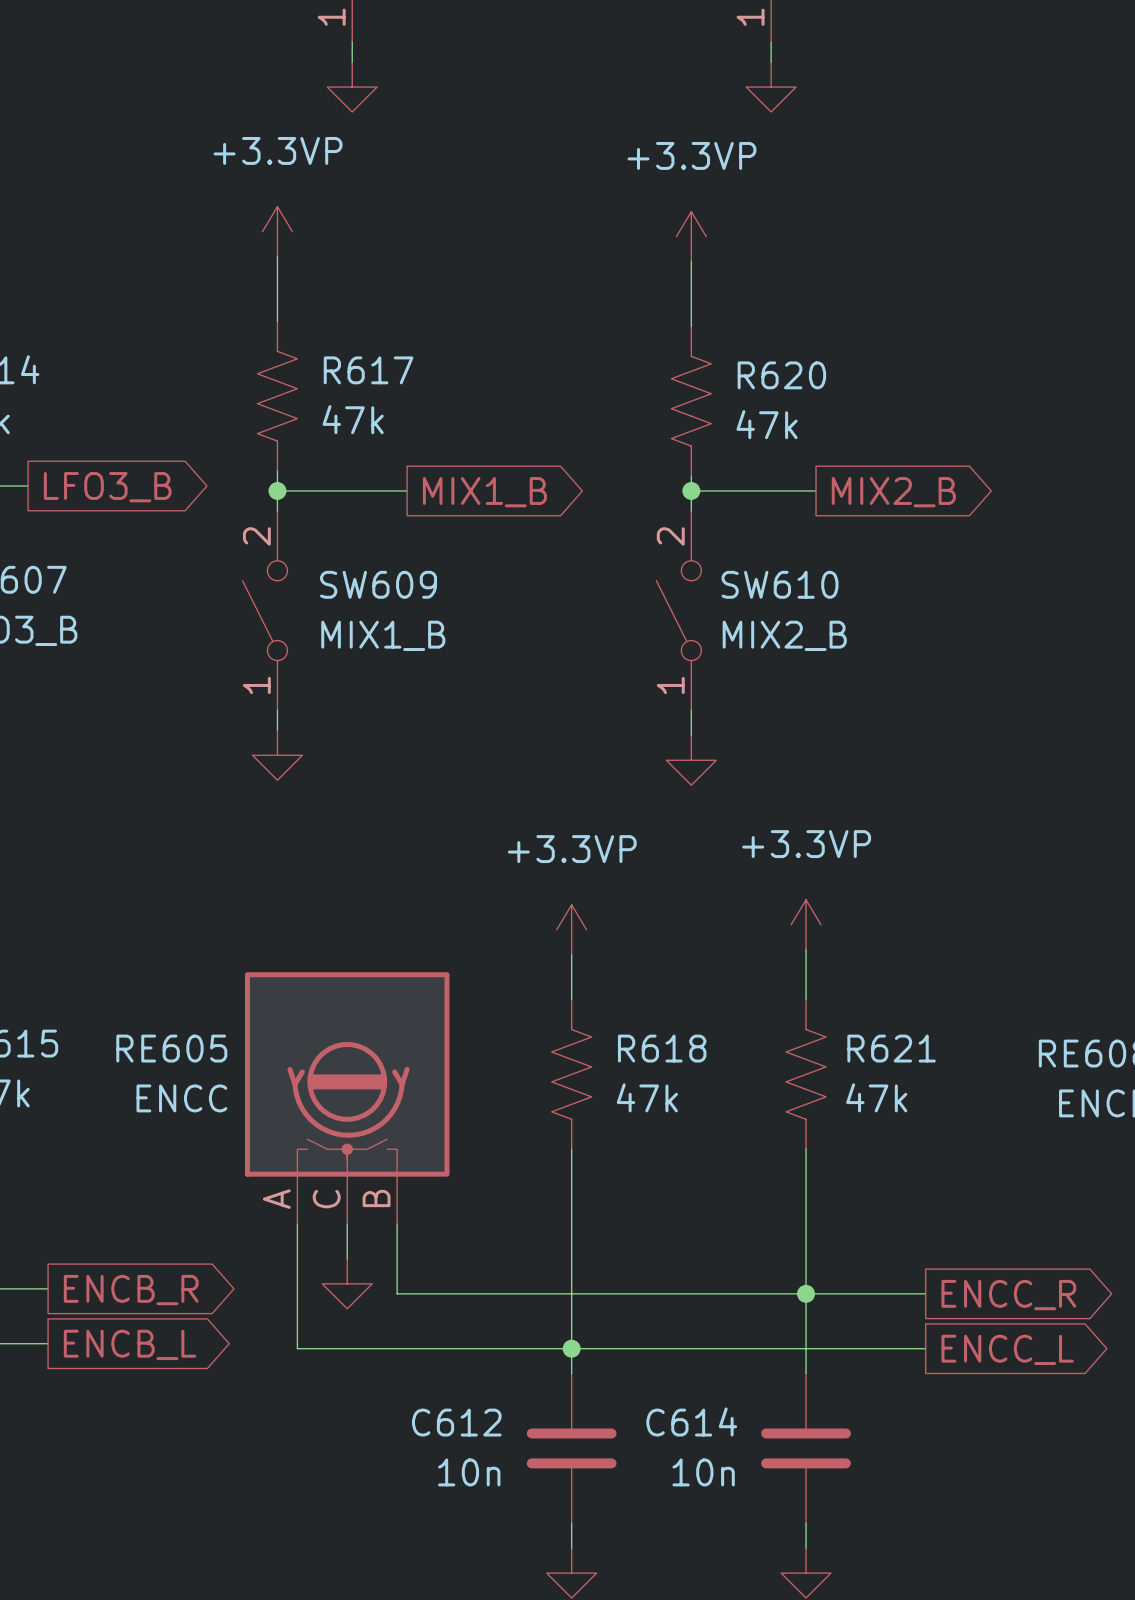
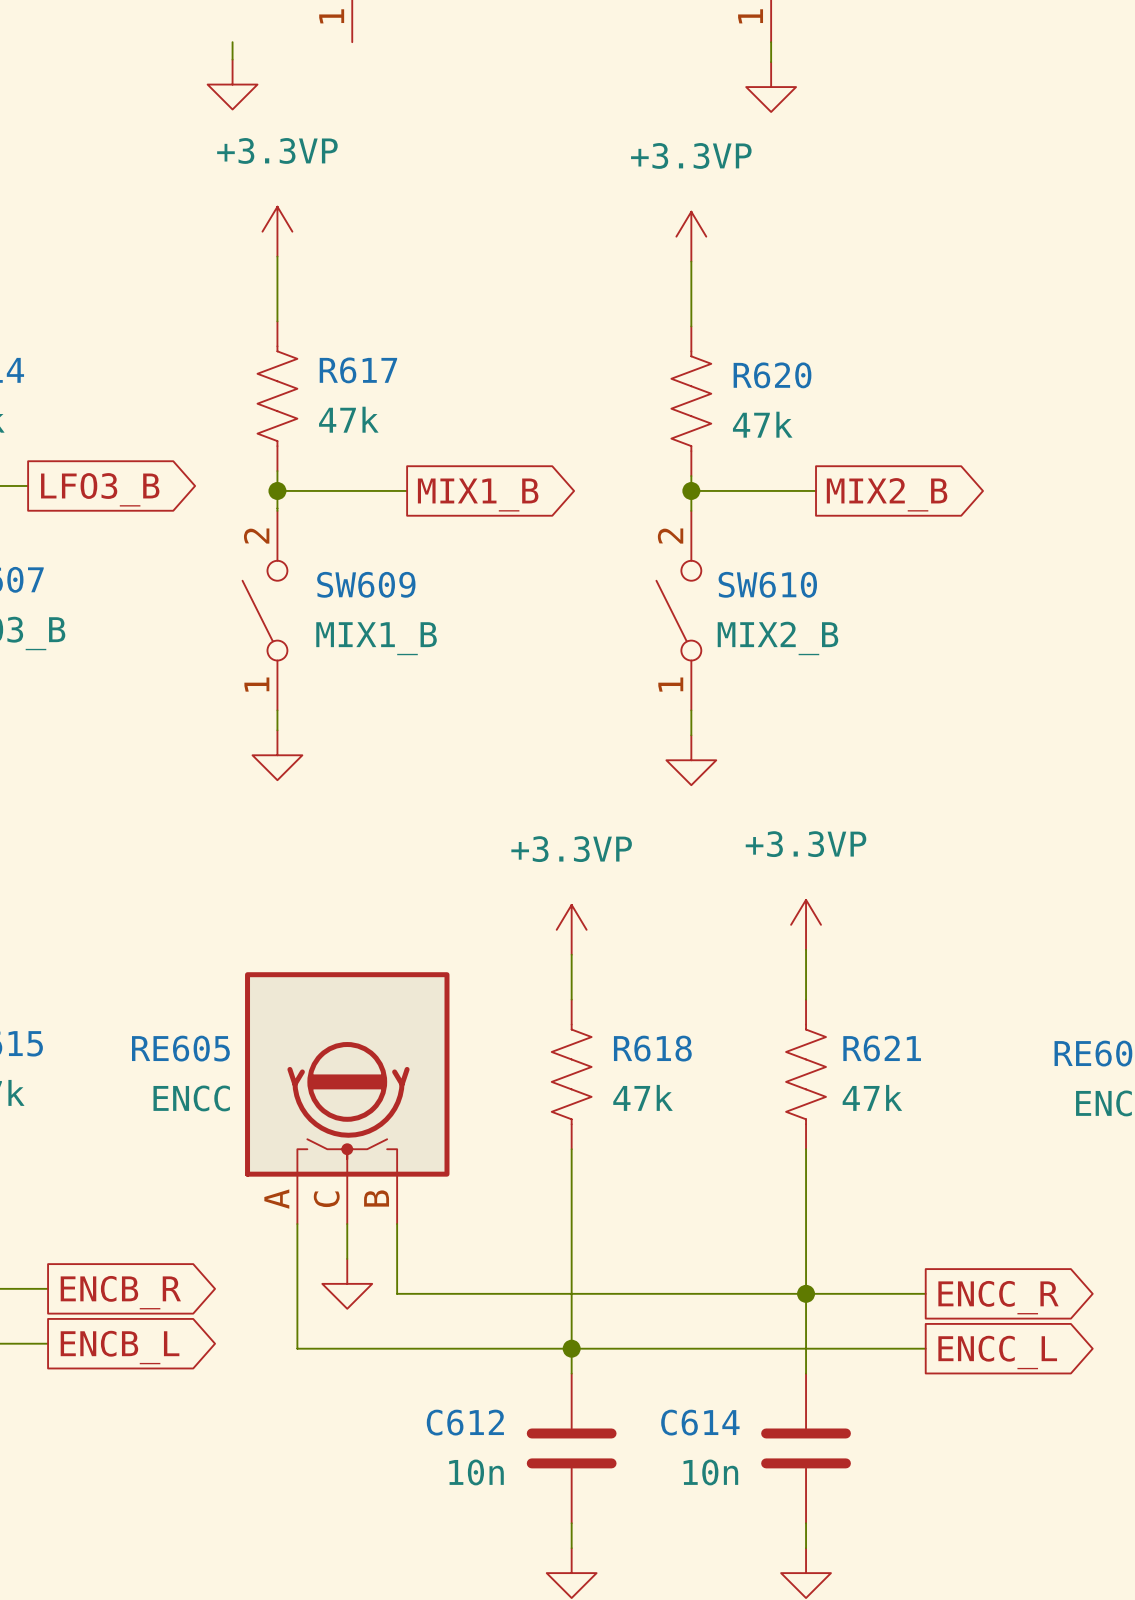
wire: none -> (232, 42) (232, 59)
wire: (352, 42) (352, 62) -> none
power symbol position: (352, 87) -> (232, 84)

